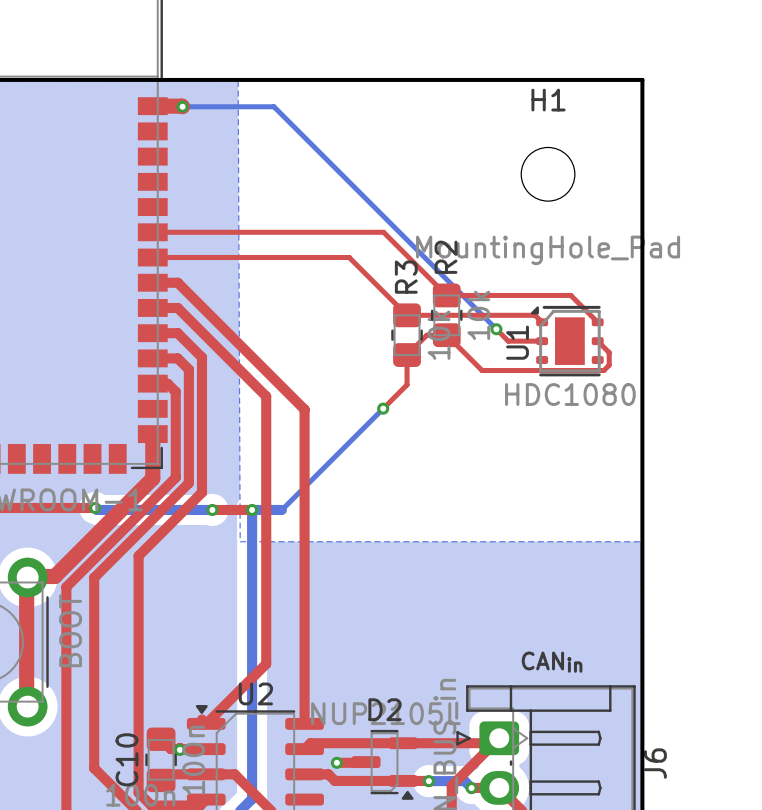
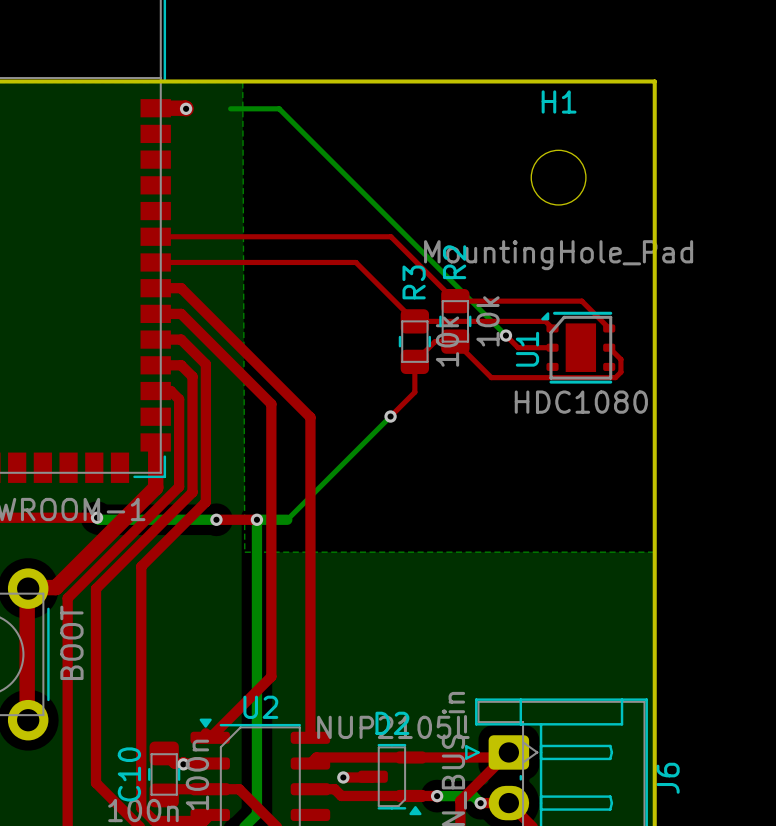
bottom track: (182, 106) (226, 106) -> none
text: CANin (552, 662) -> none

